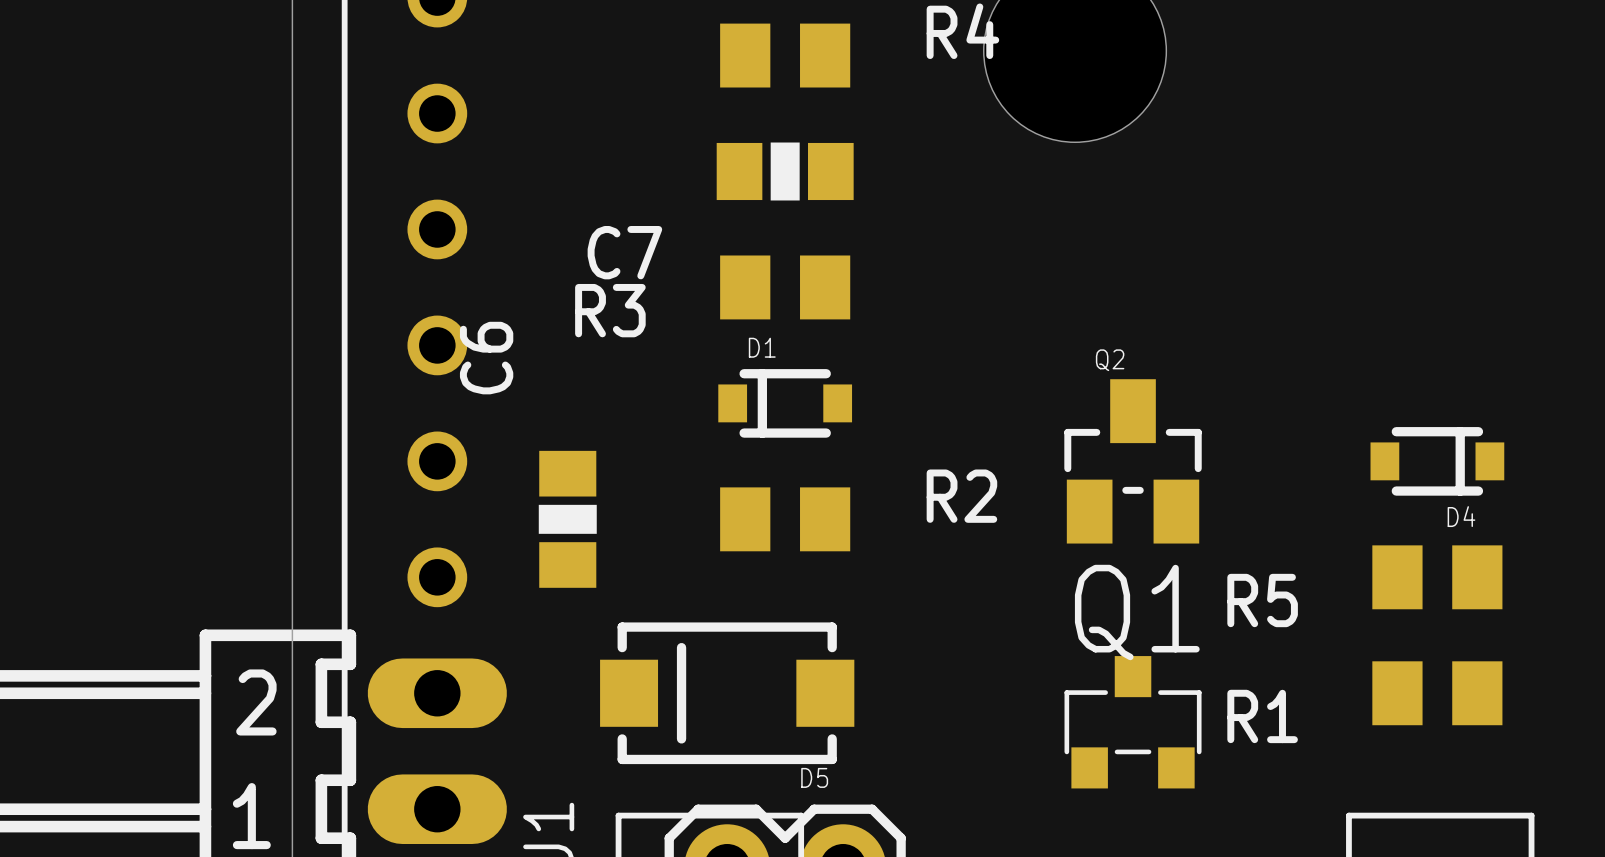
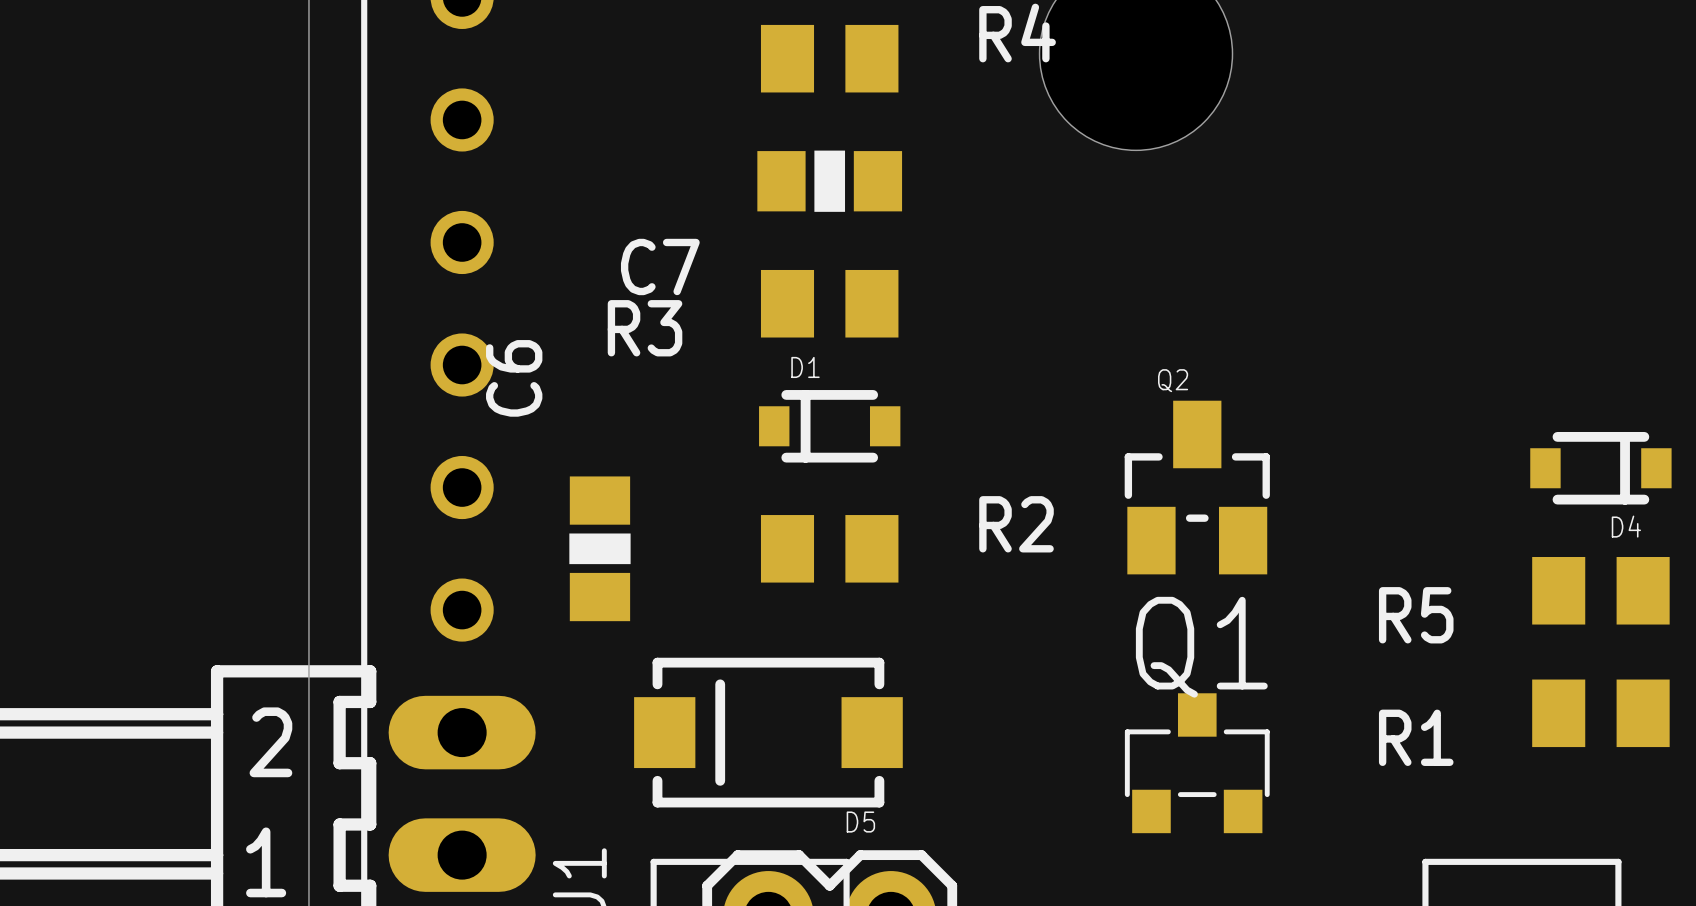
D4 position: (1437, 461) -> (1600, 468)
R5 position: (1437, 577) -> (1600, 590)
R1 position: (1437, 693) -> (1600, 713)

